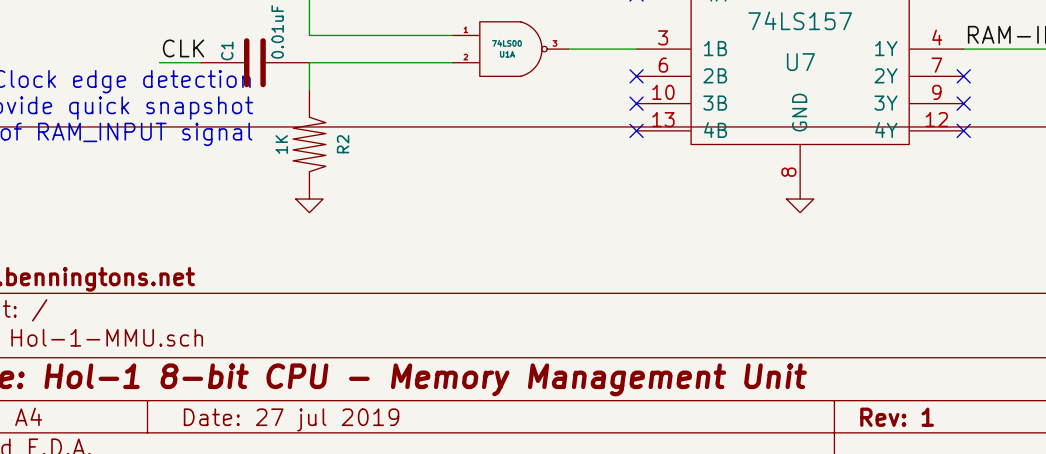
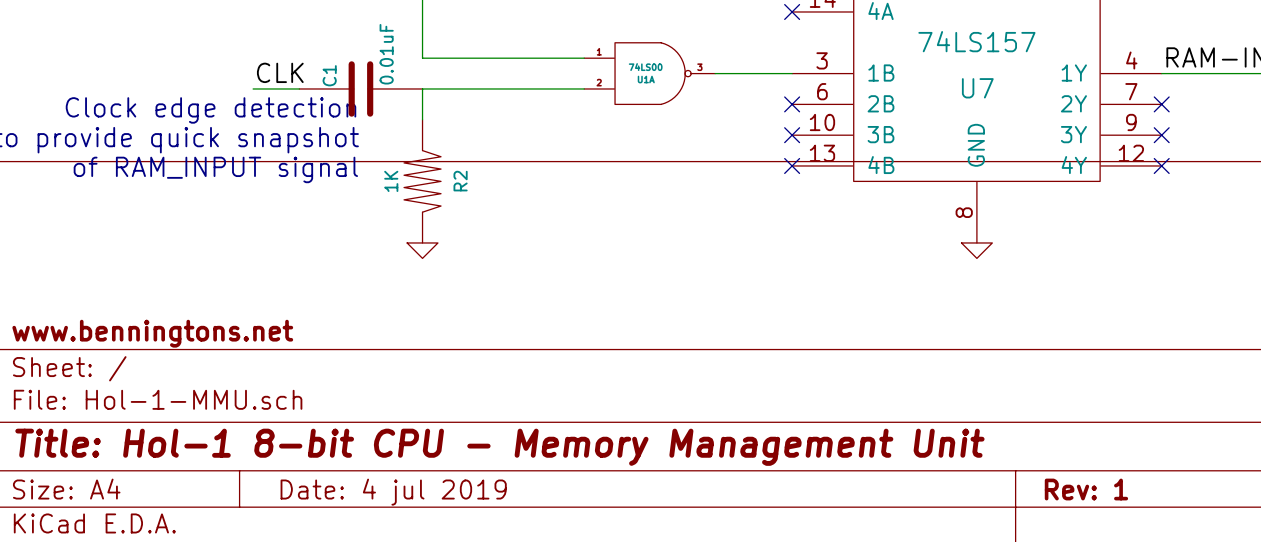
title block: Date: 27 jul 2019 (291, 419) -> Date: 4 jul 2019 (393, 492)

